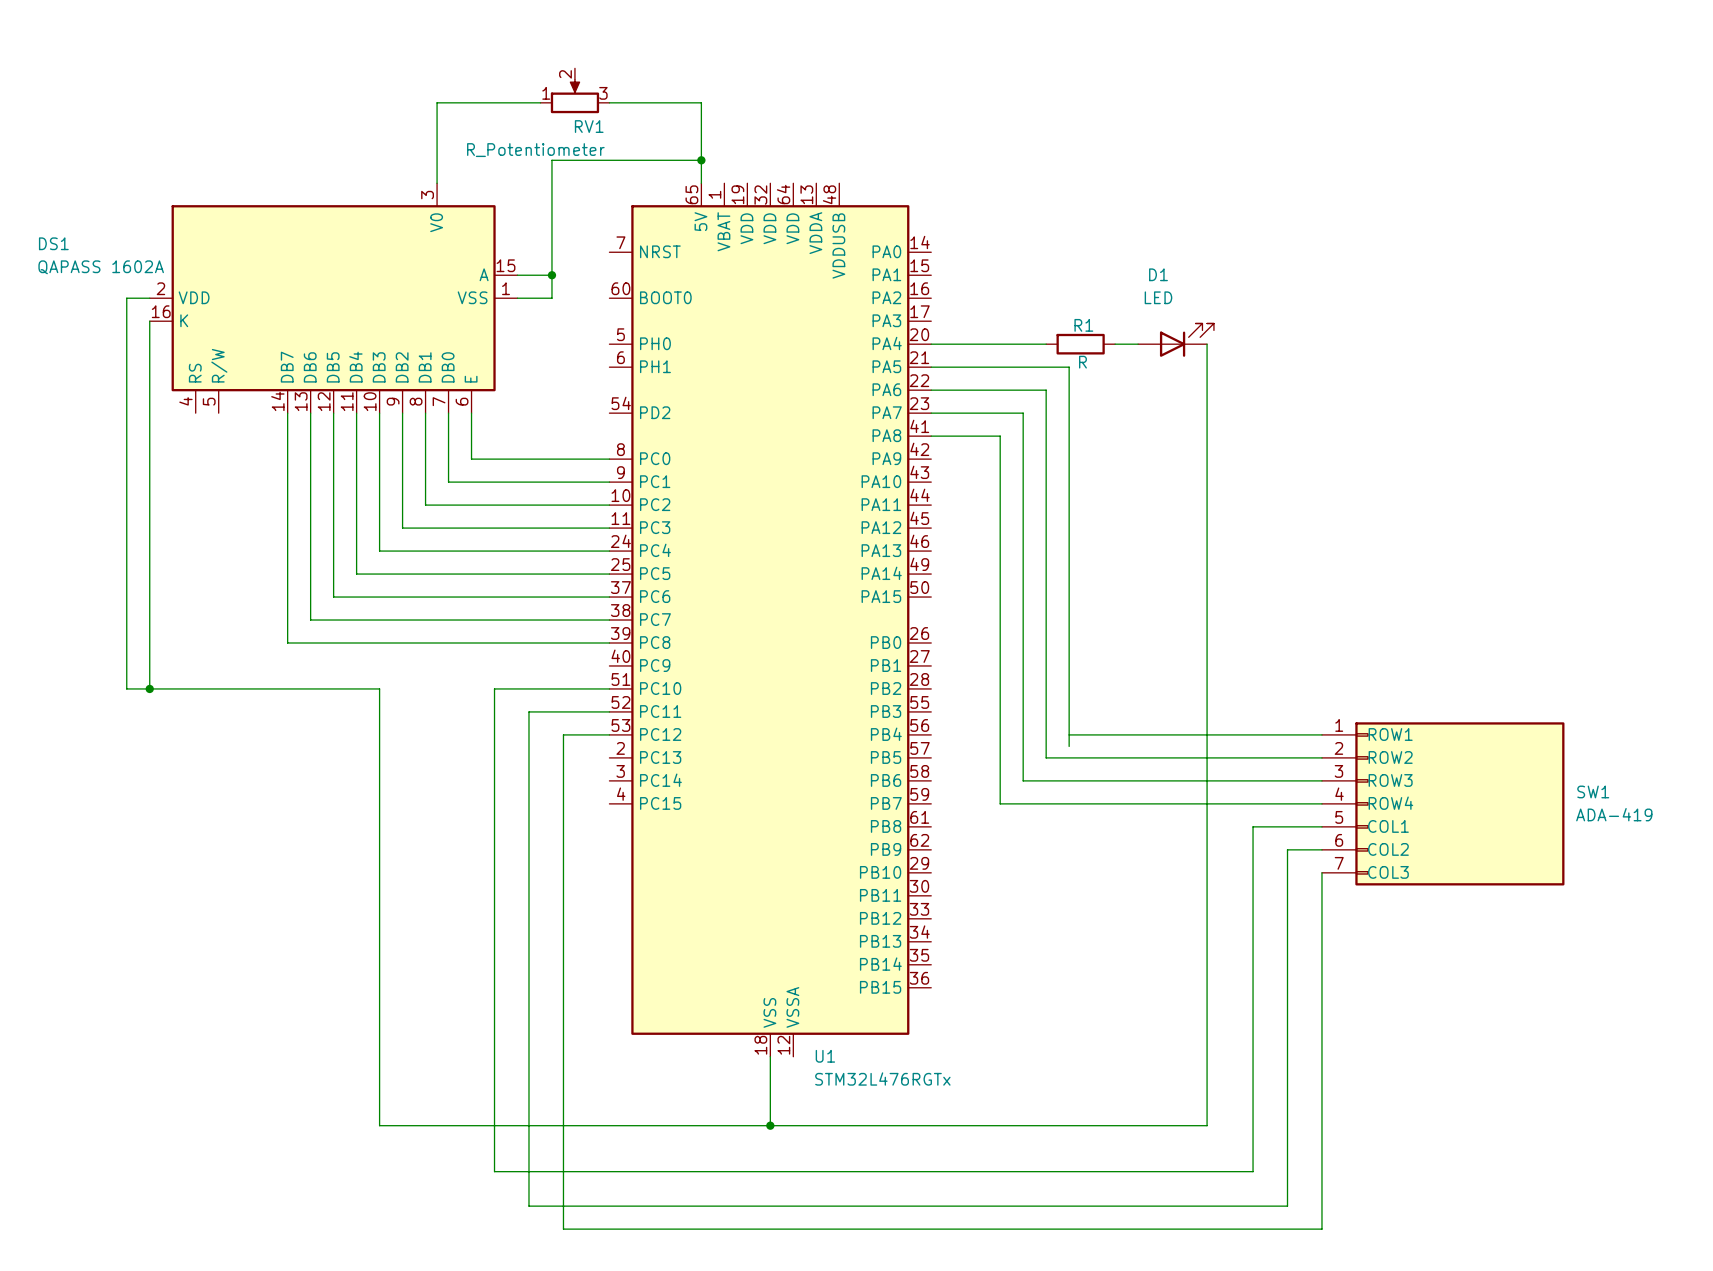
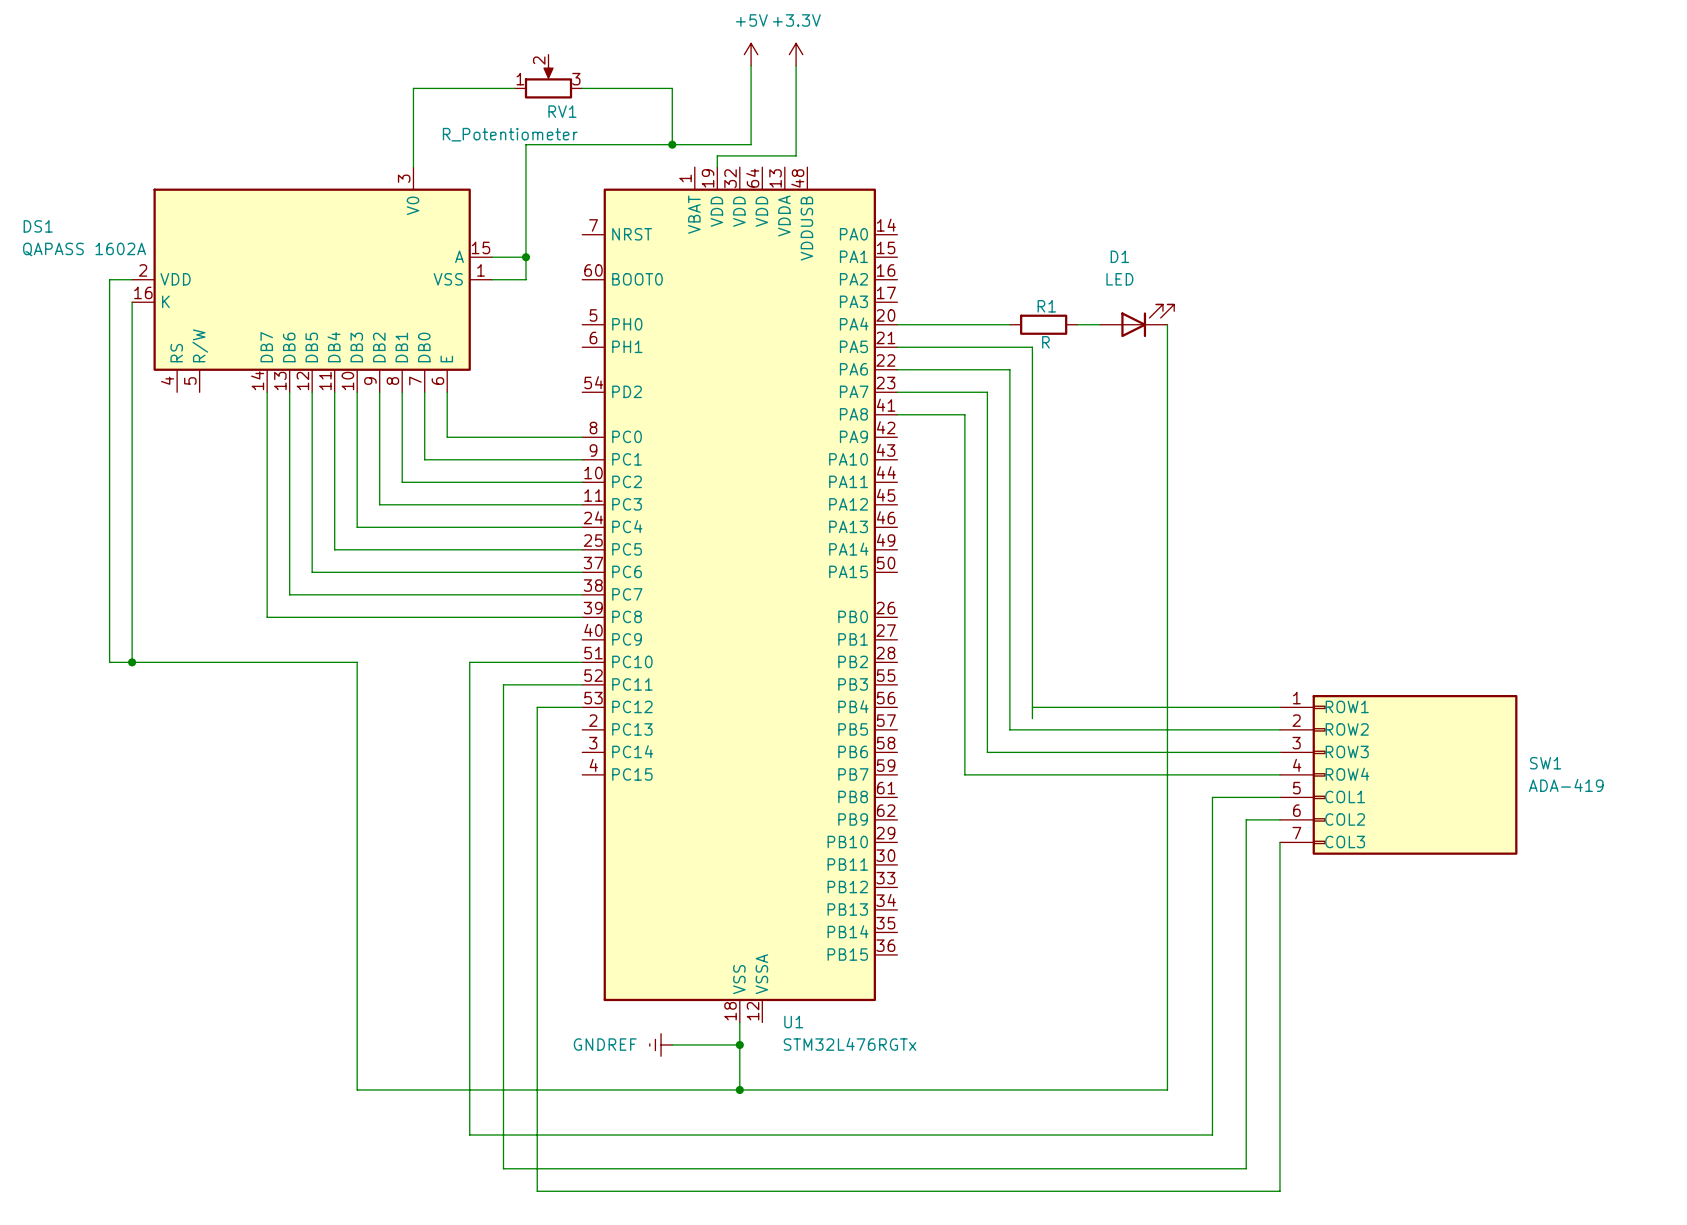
power symbol: none -> +5V (751, 54)
power symbol: none -> +3.3V (796, 54)
wire: none -> (796, 65) (796, 155) (717, 155) (717, 167)
wire: (701, 160) (701, 183) -> (672, 144) (751, 144) (751, 65)
U1 symbol: [609, 183, 932, 1057] -> [582, 167, 898, 1023]
power symbol: none -> GNDREF (661, 1044)
wire: none -> (672, 1044) (739, 1044)
junction: none -> (739, 1044)

